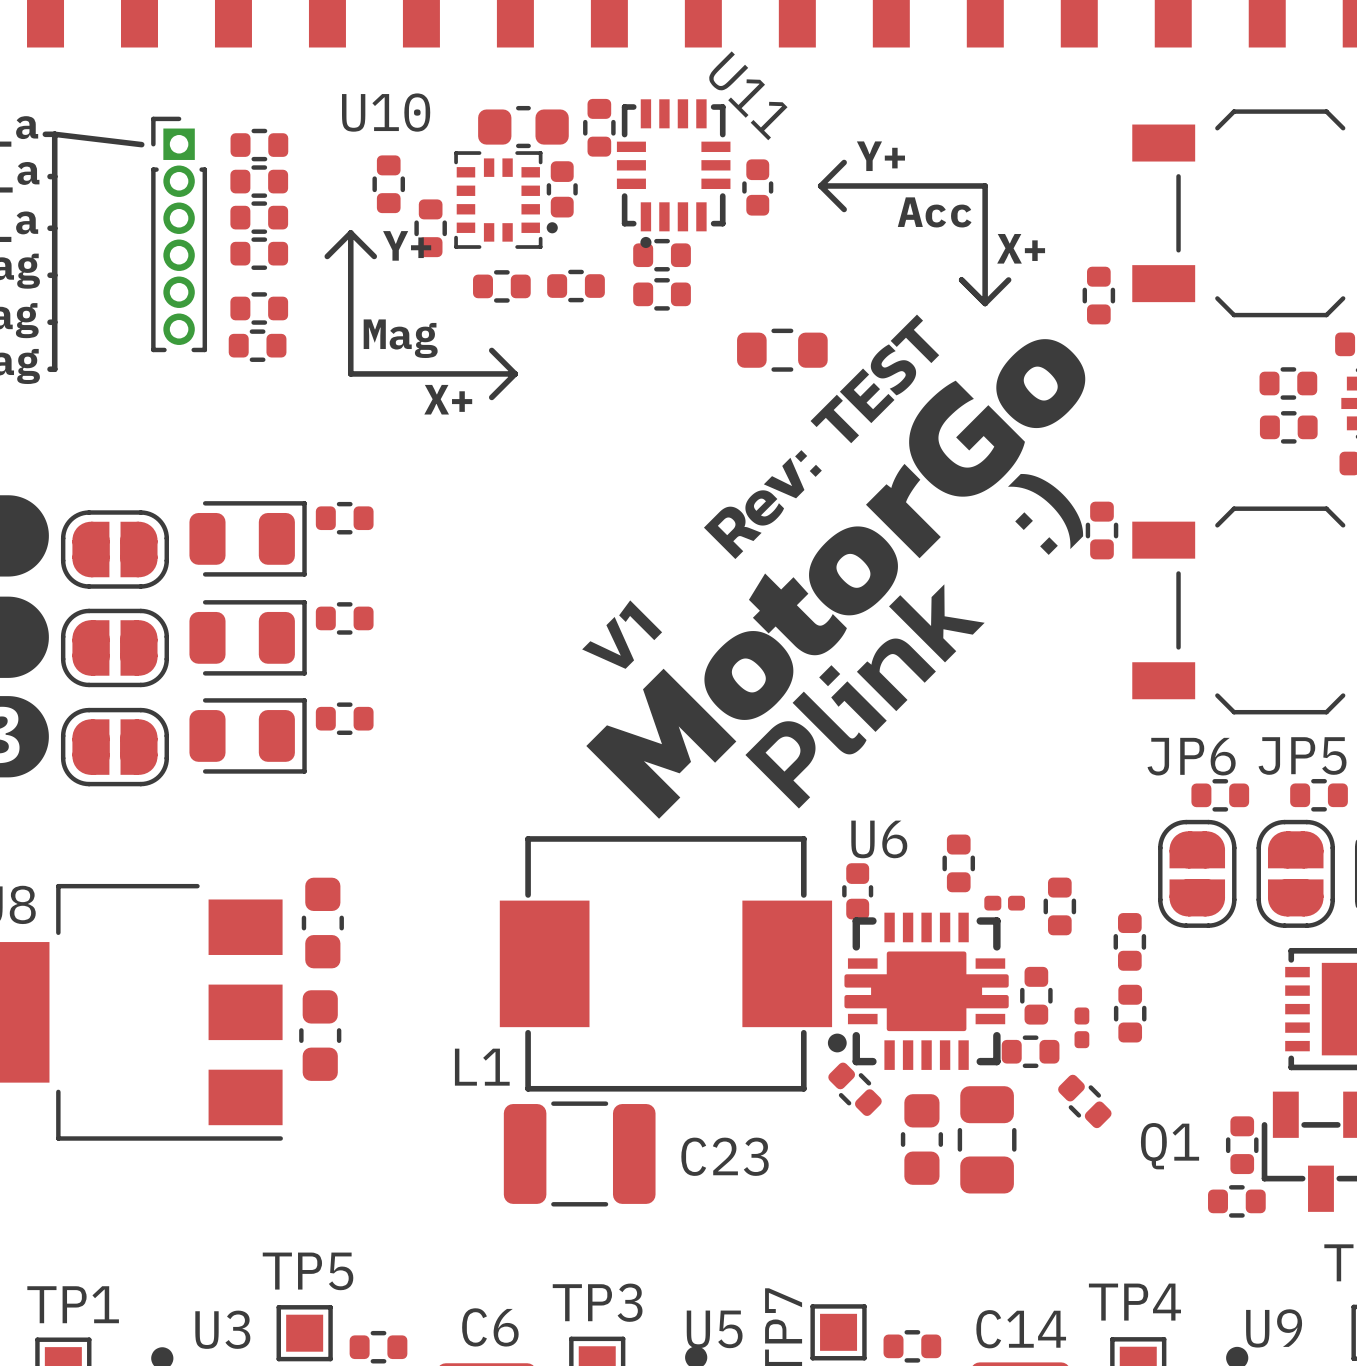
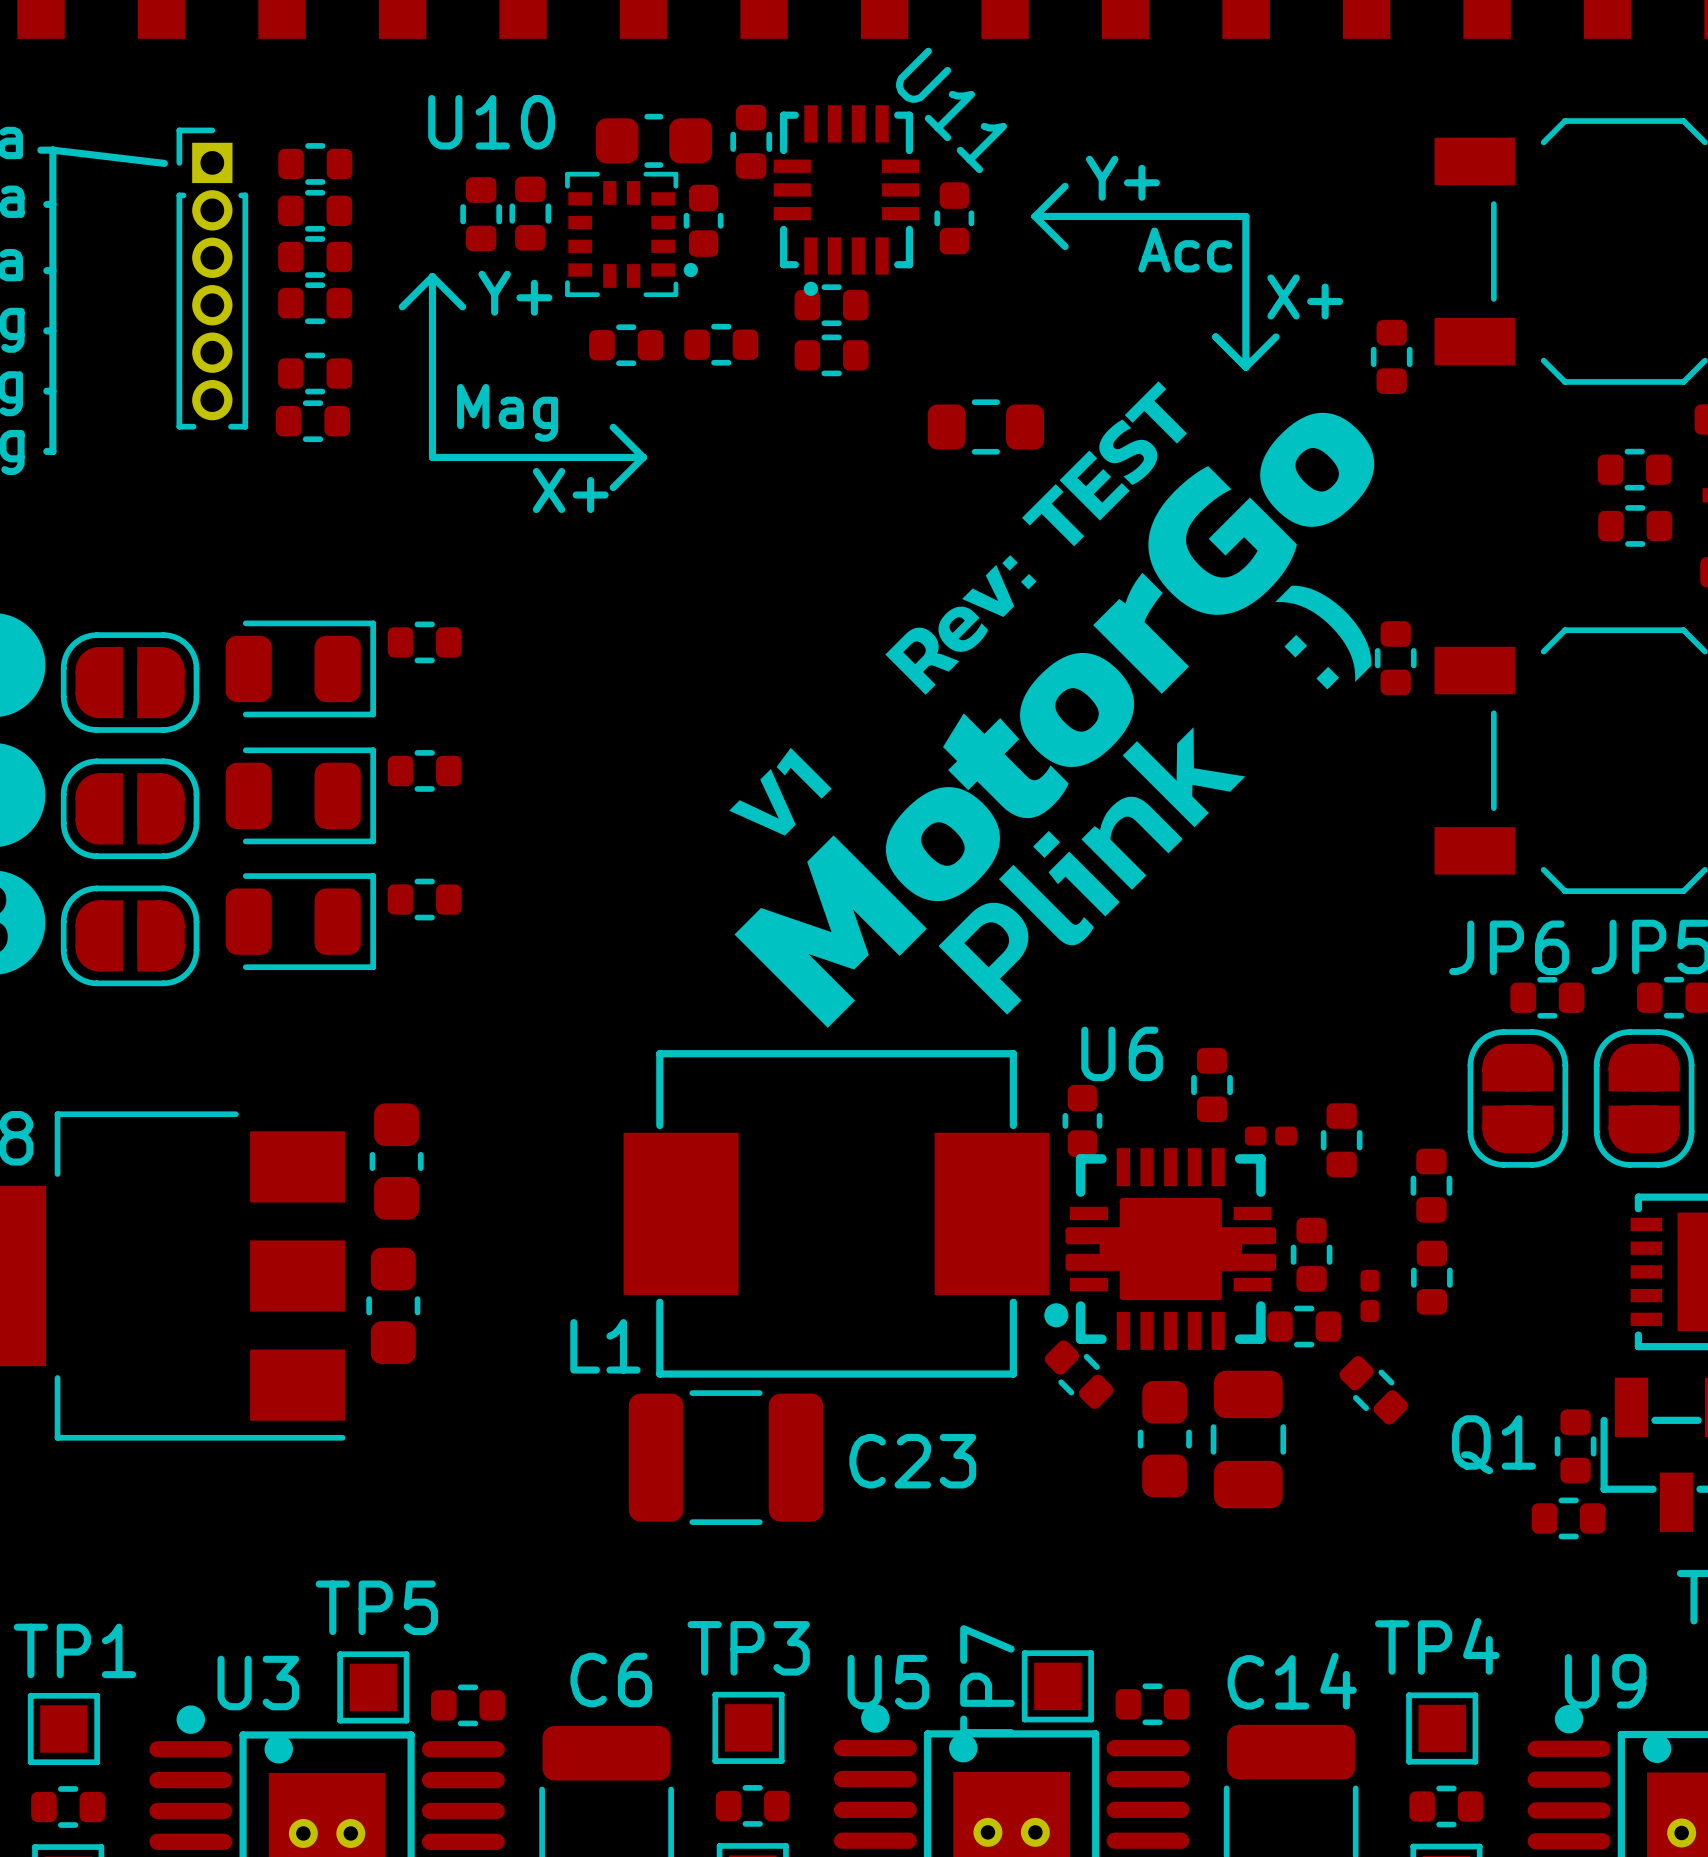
part position: (430, 228) -> (530, 213)

